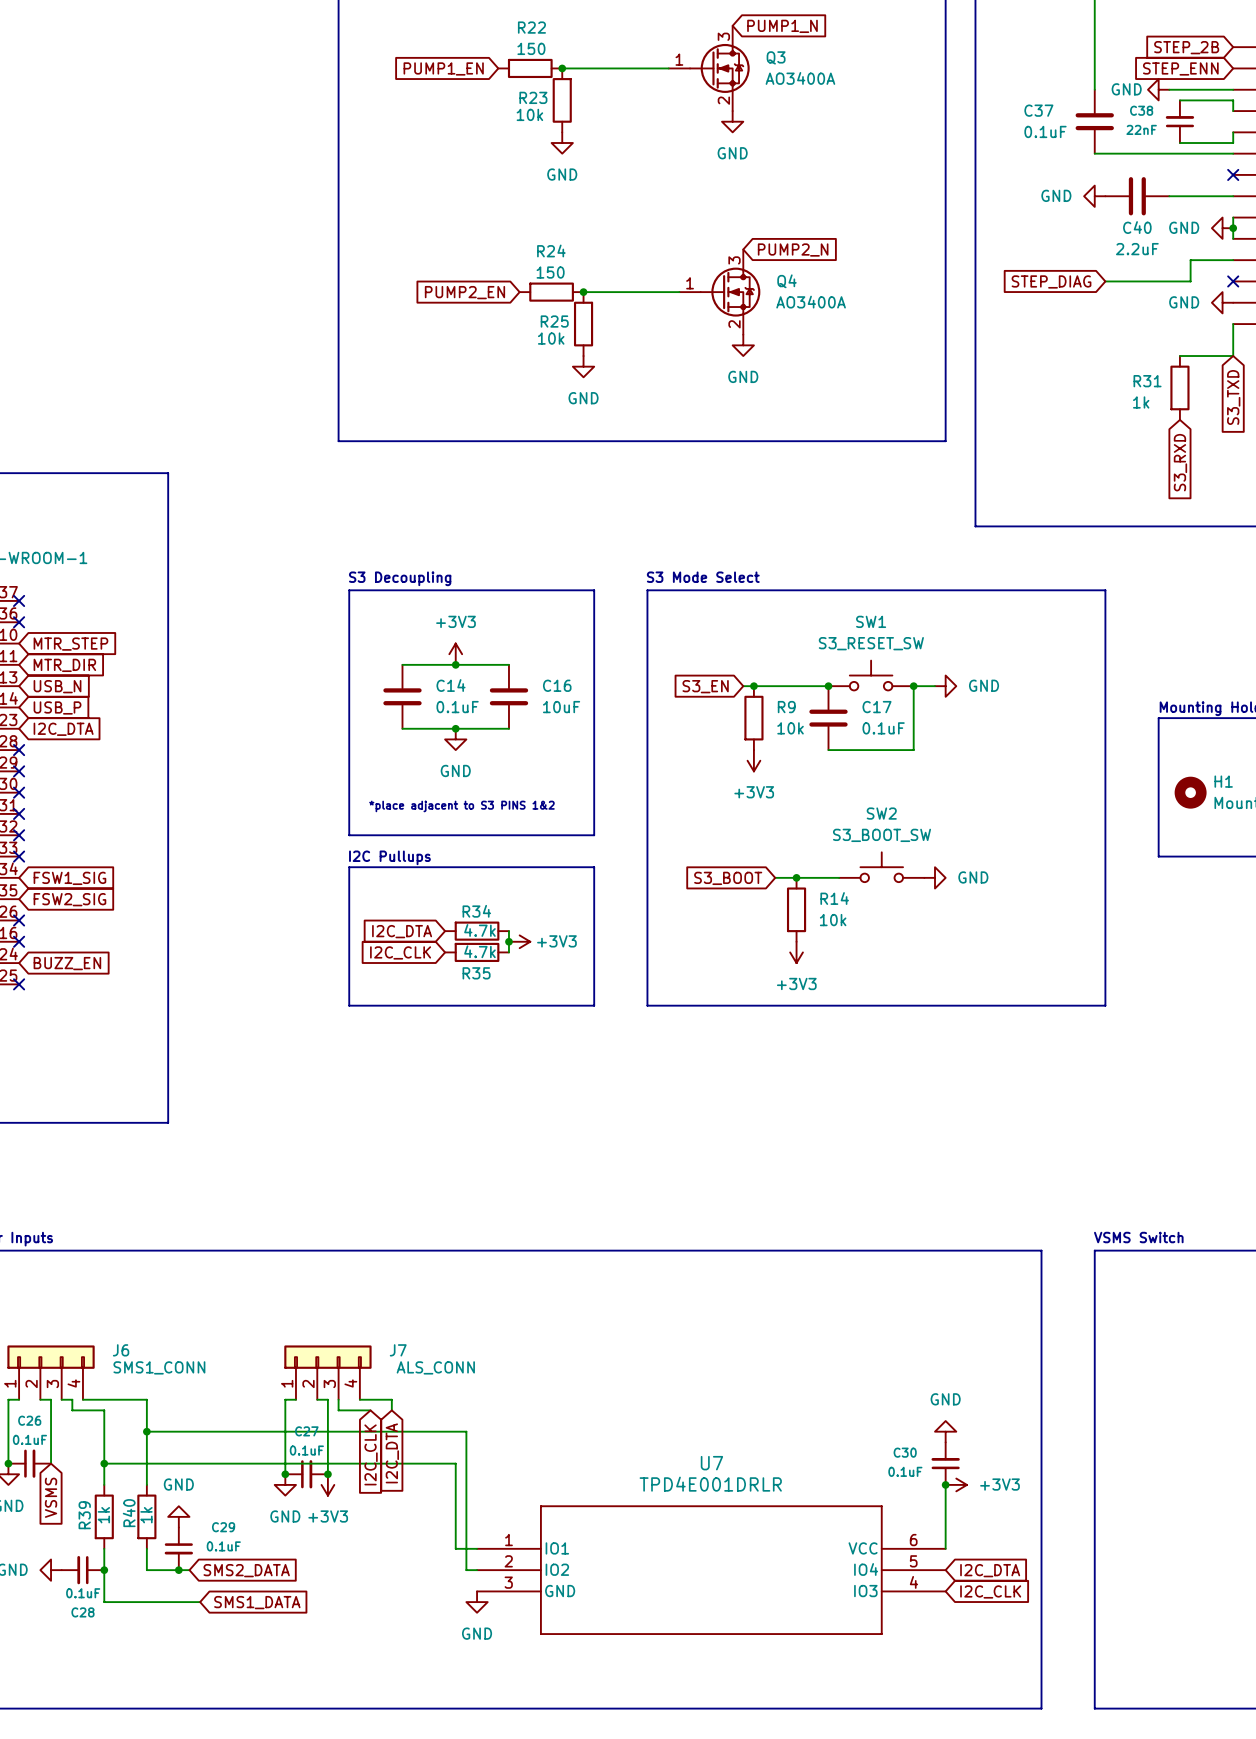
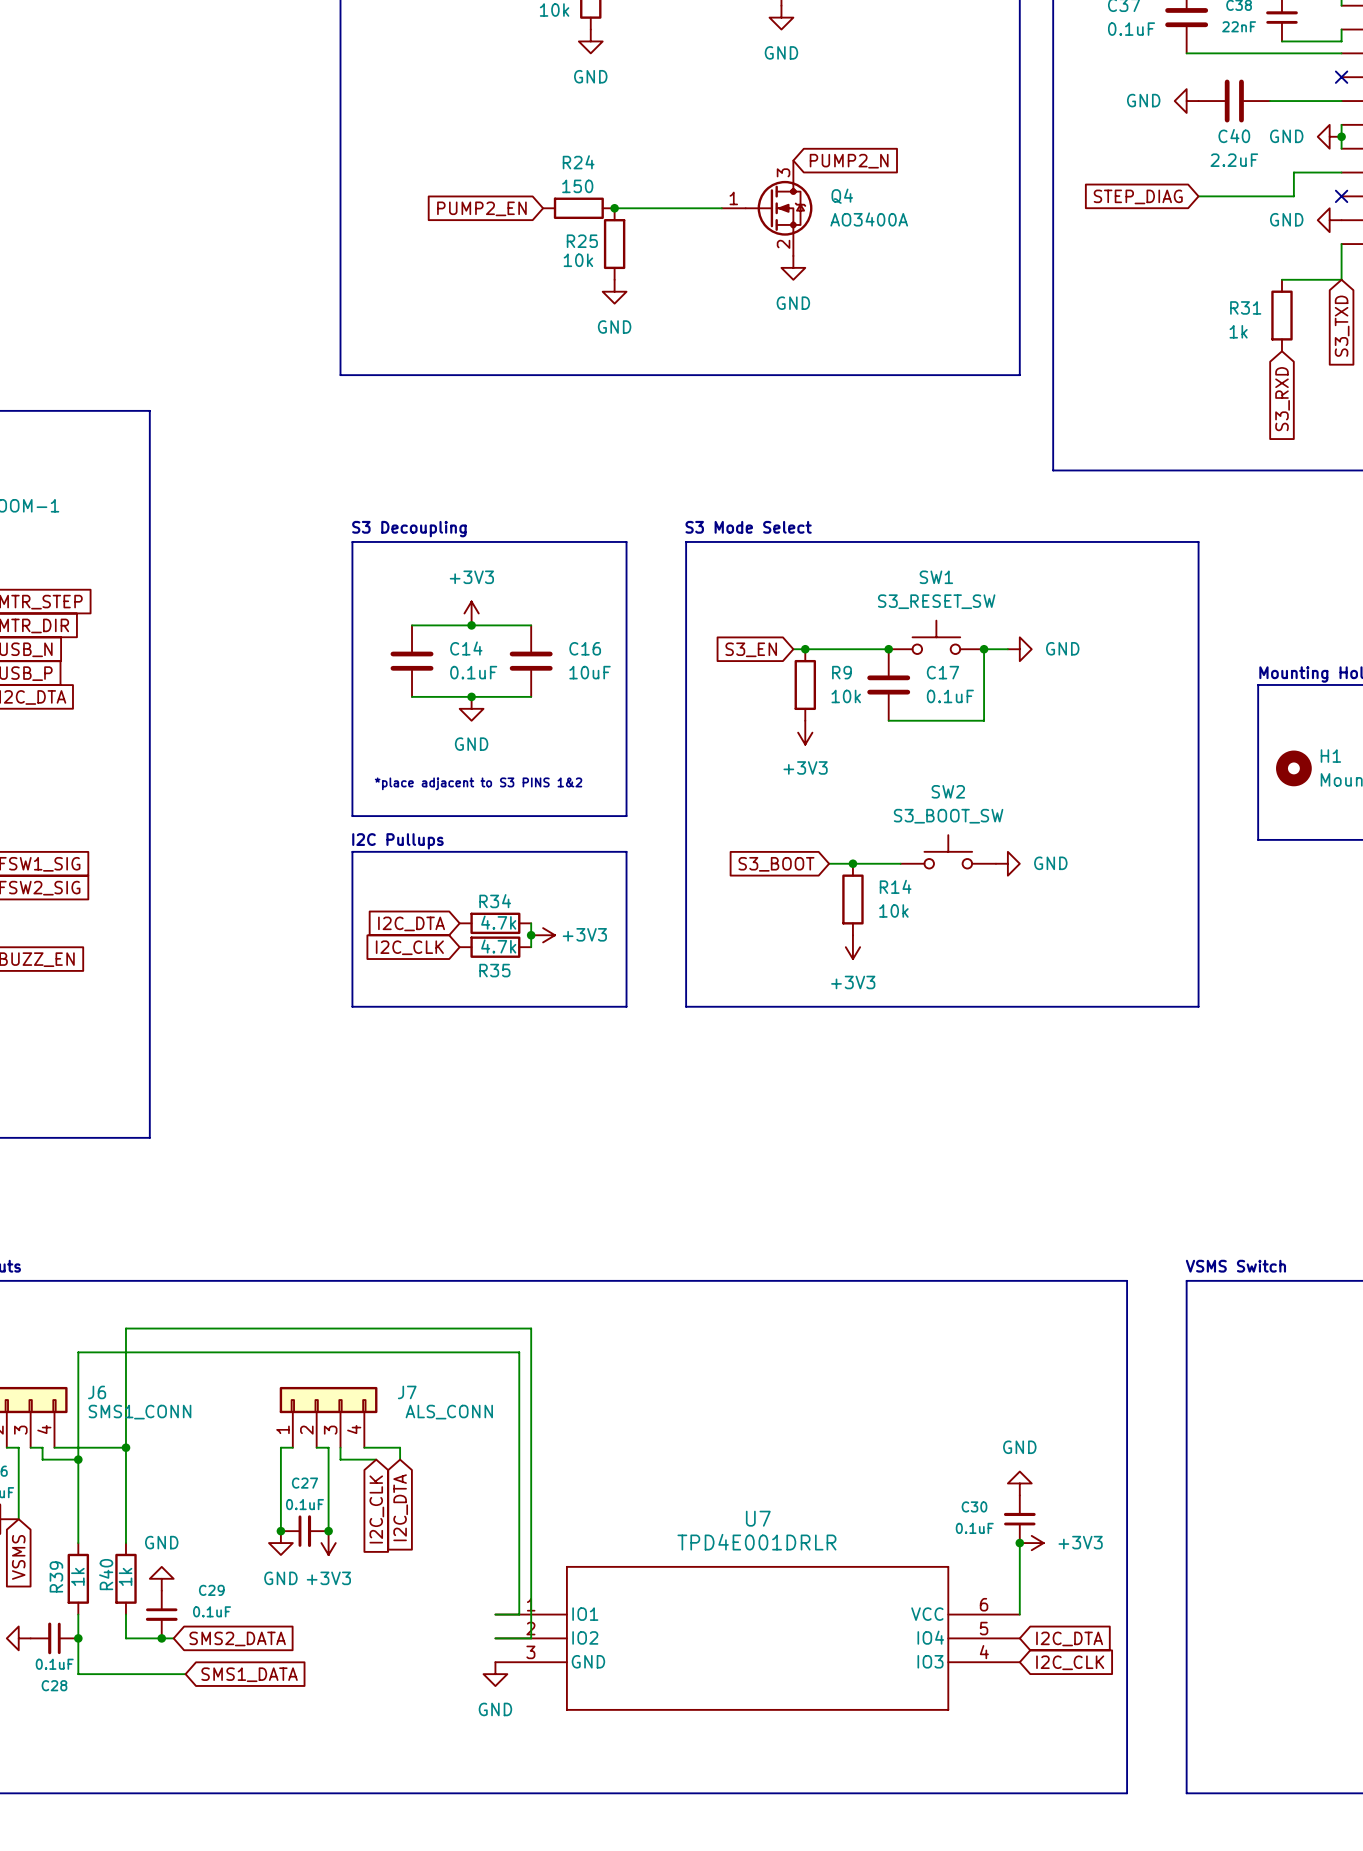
junction: none -> (125, 1447)
junction: none -> (78, 1459)
wire: (146, 1431) (466, 1431) (466, 1570) (477, 1570) -> (125, 1447) (125, 1328) (531, 1328) (531, 1638) (495, 1638)
junction: (146, 1431) -> none
wire: (104, 1463) (455, 1463) (455, 1548) (477, 1548) -> (78, 1459) (78, 1352) (519, 1352) (519, 1614) (495, 1614)
junction: (104, 1463) -> none

